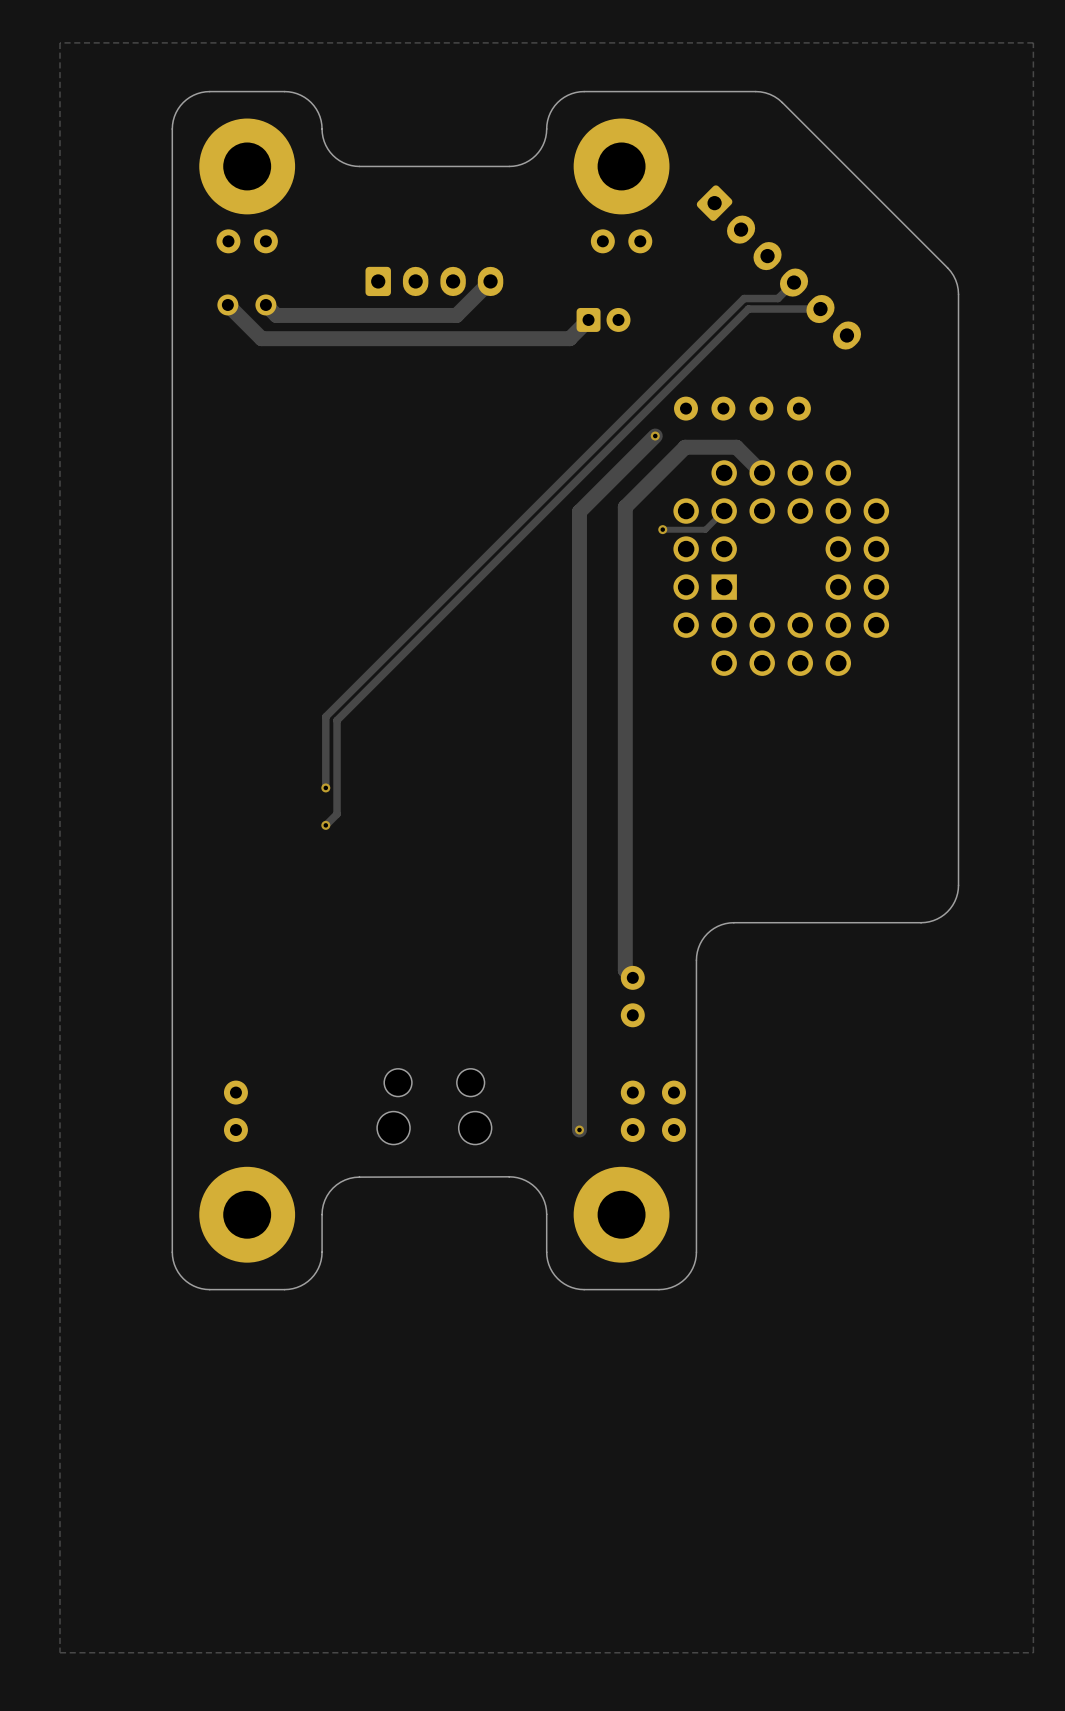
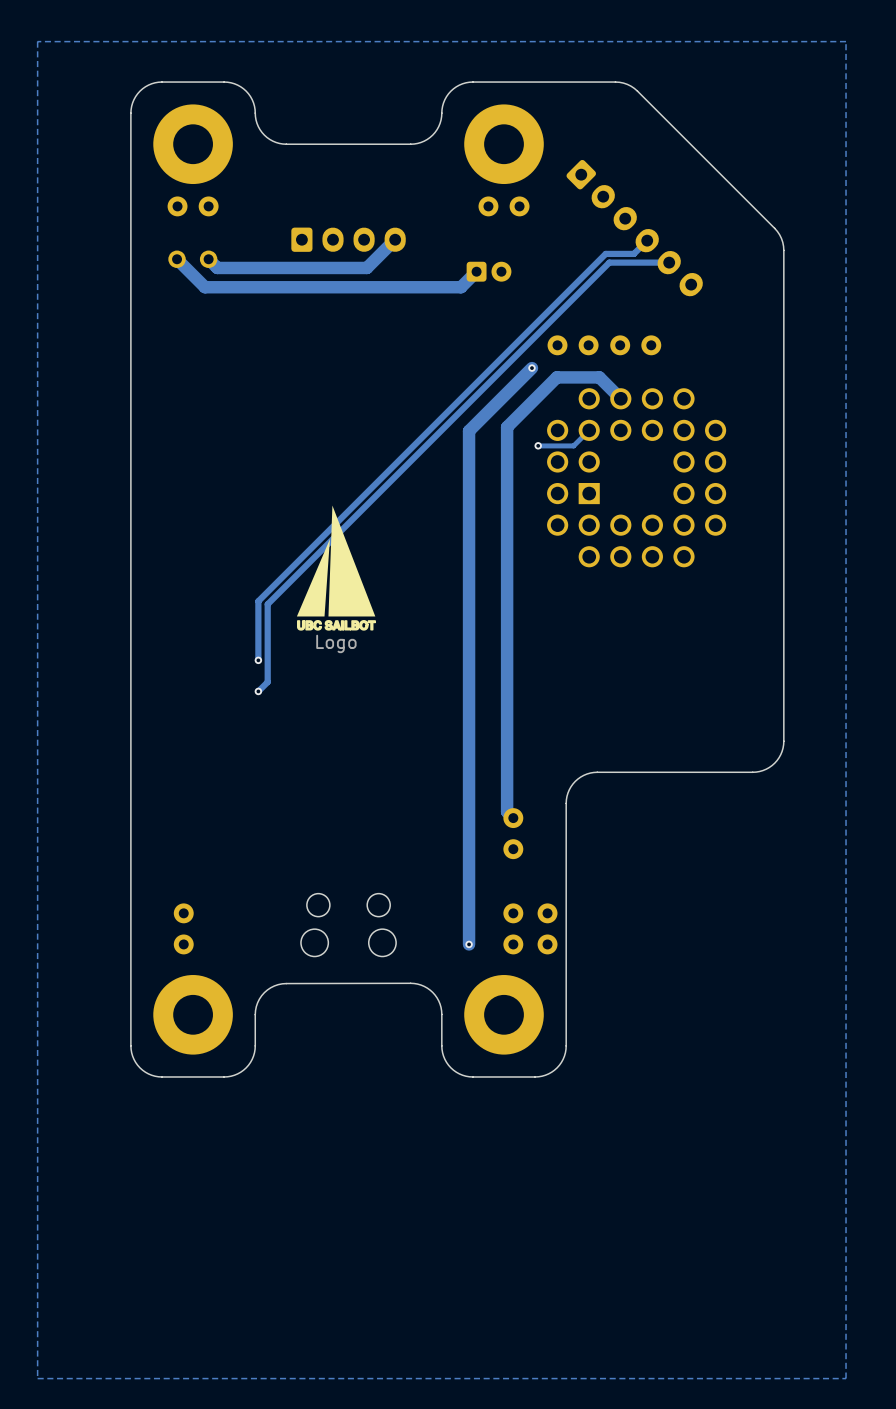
drawing: none -> [296, 505, 376, 630]

